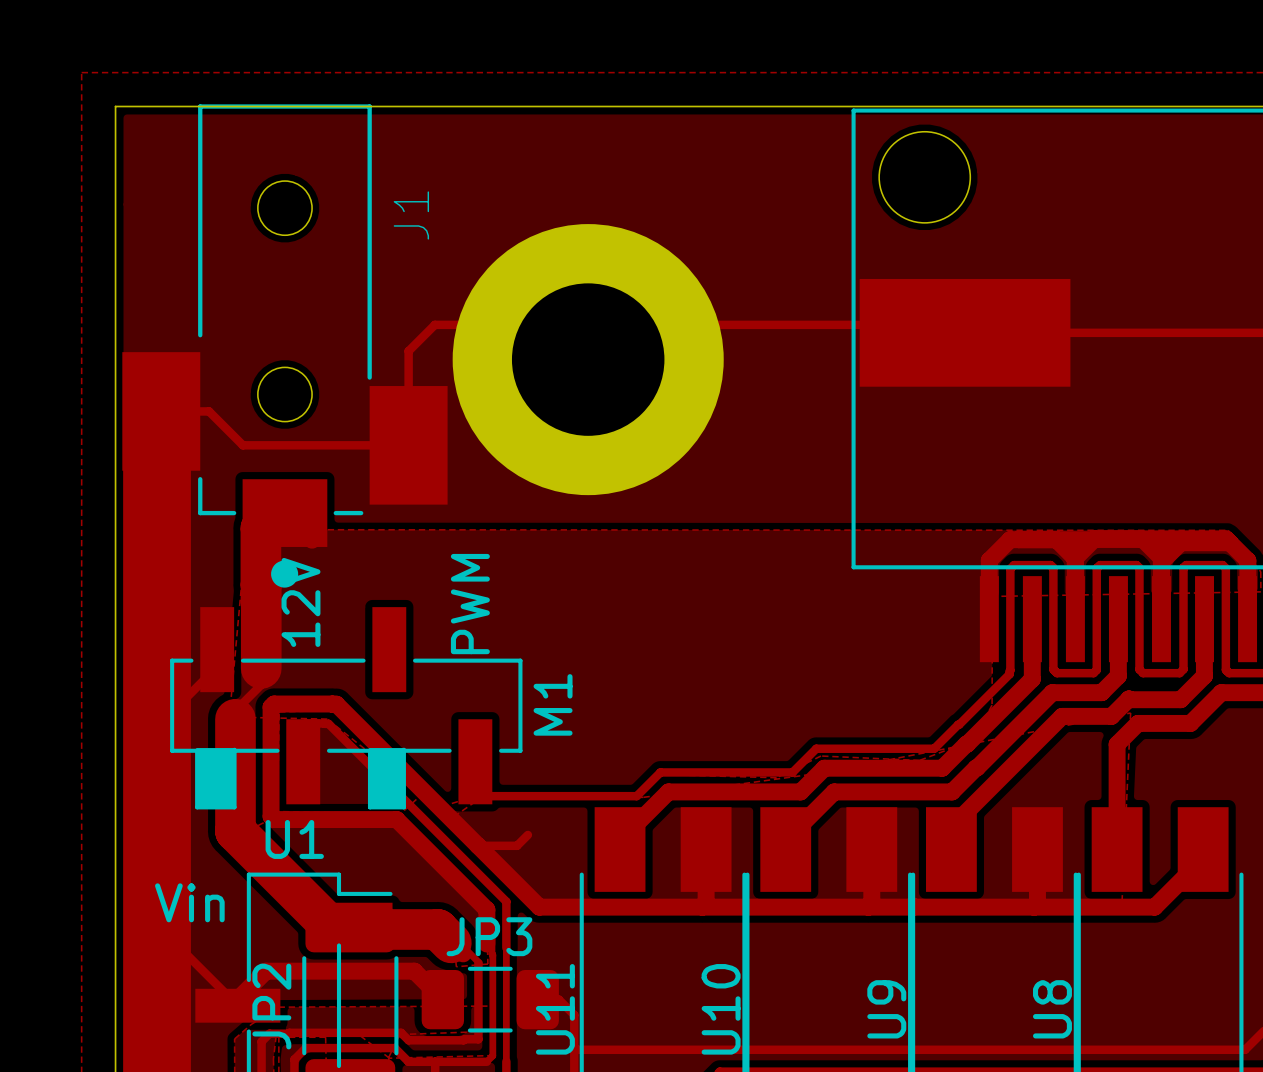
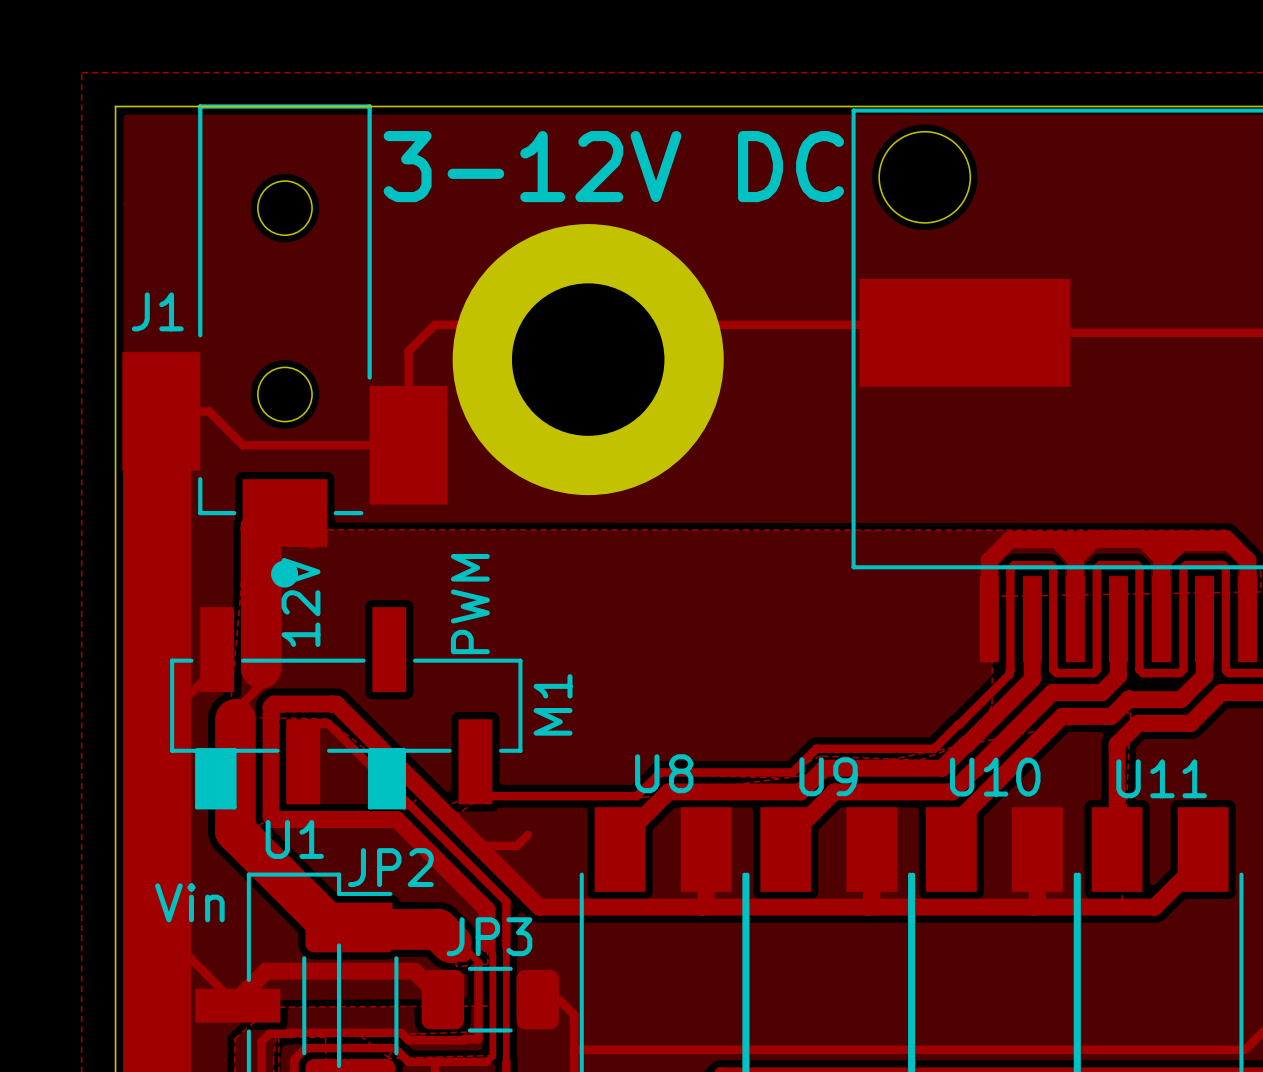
text: none -> 3-12V DC (613, 166)
J1 name rotation: 0° (411, 215) -> 90° clockwise (157, 311)
J1 name position: J1 (411, 215) -> J1 (157, 311)
JP2 name rotation: 0° (271, 1006) -> 90° clockwise (390, 867)
JP2 name position: JP2 (271, 1006) -> JP2 (390, 867)
U11 name: U11 (555, 1009) -> U8 (664, 773)
U10 name: U10 (721, 1009) -> U9 (828, 776)
U9 name: U9 (886, 1009) -> U10 (995, 777)
U8 name: U8 (1052, 1009) -> U11 (1161, 778)

